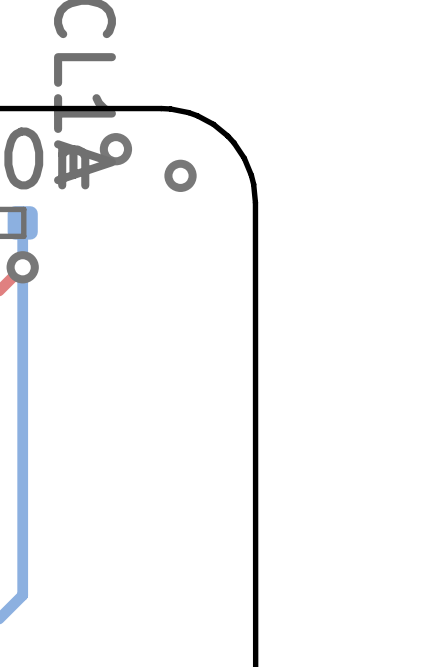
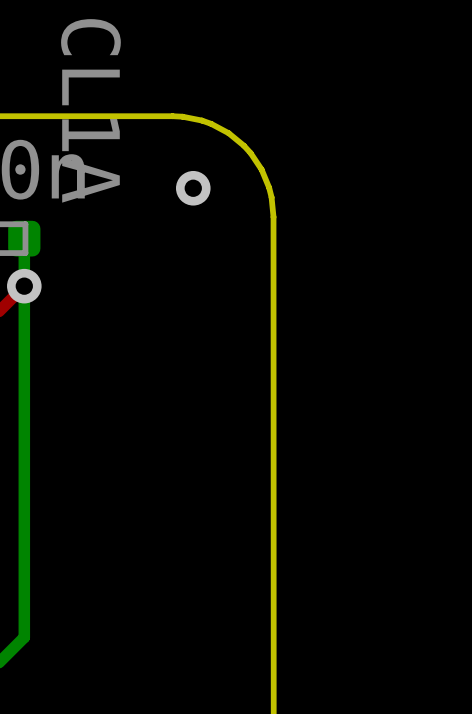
via: (115, 149) -> none

